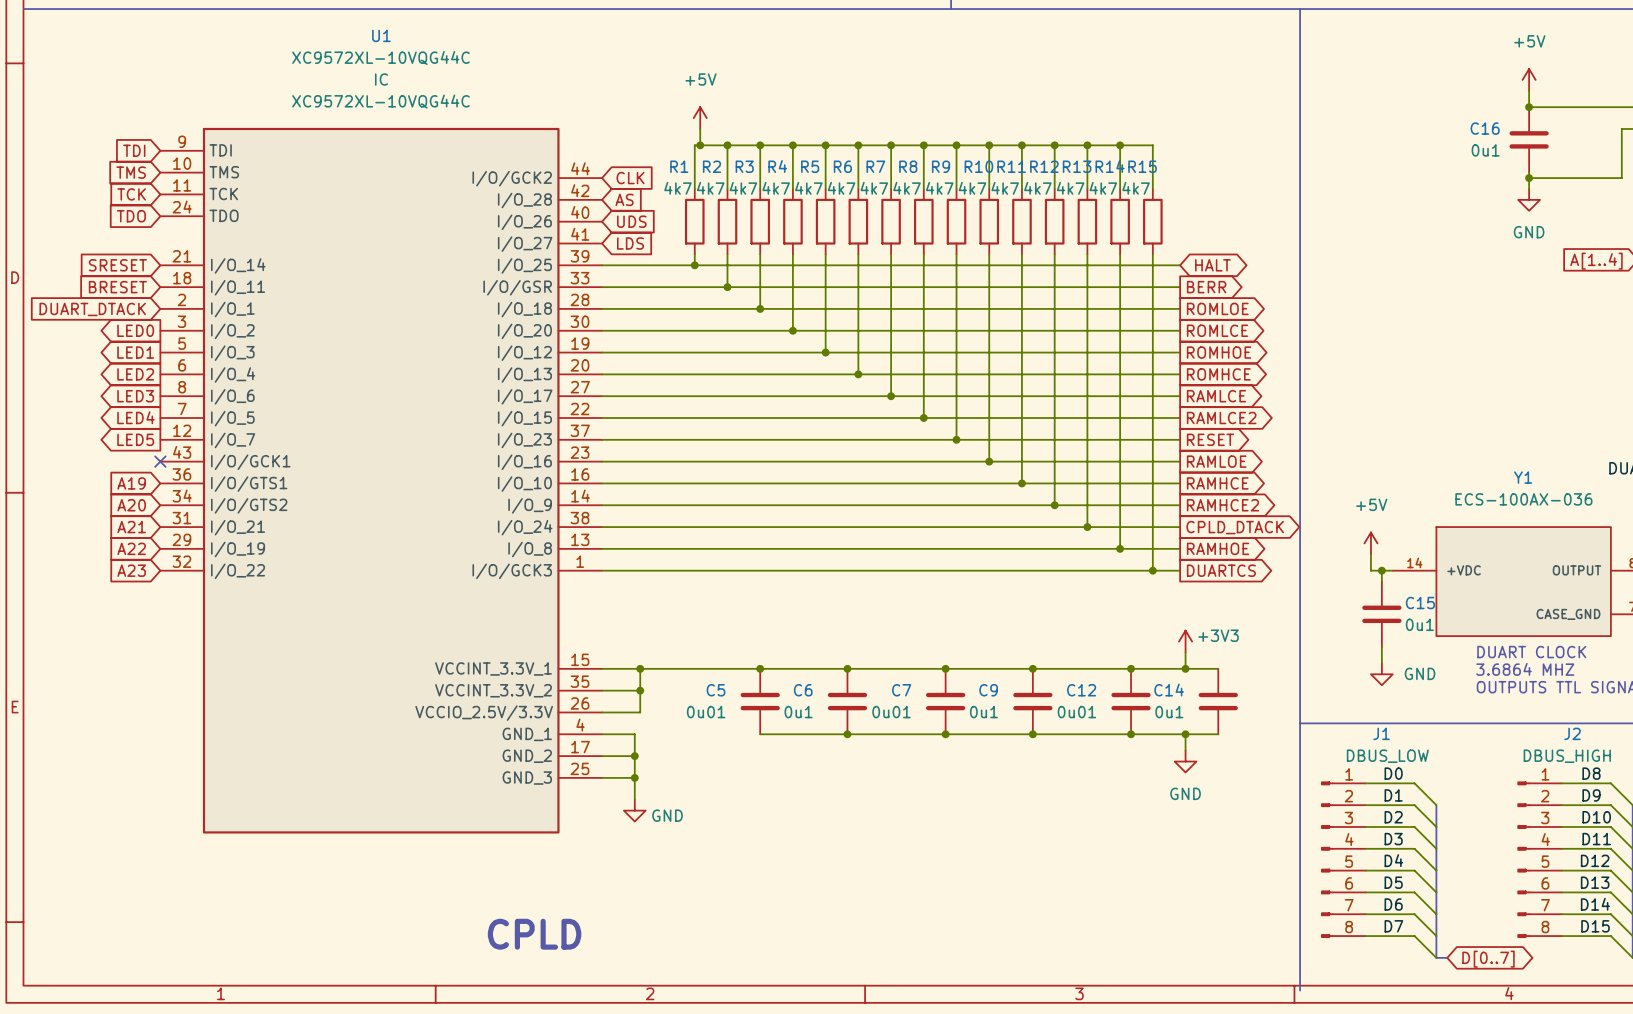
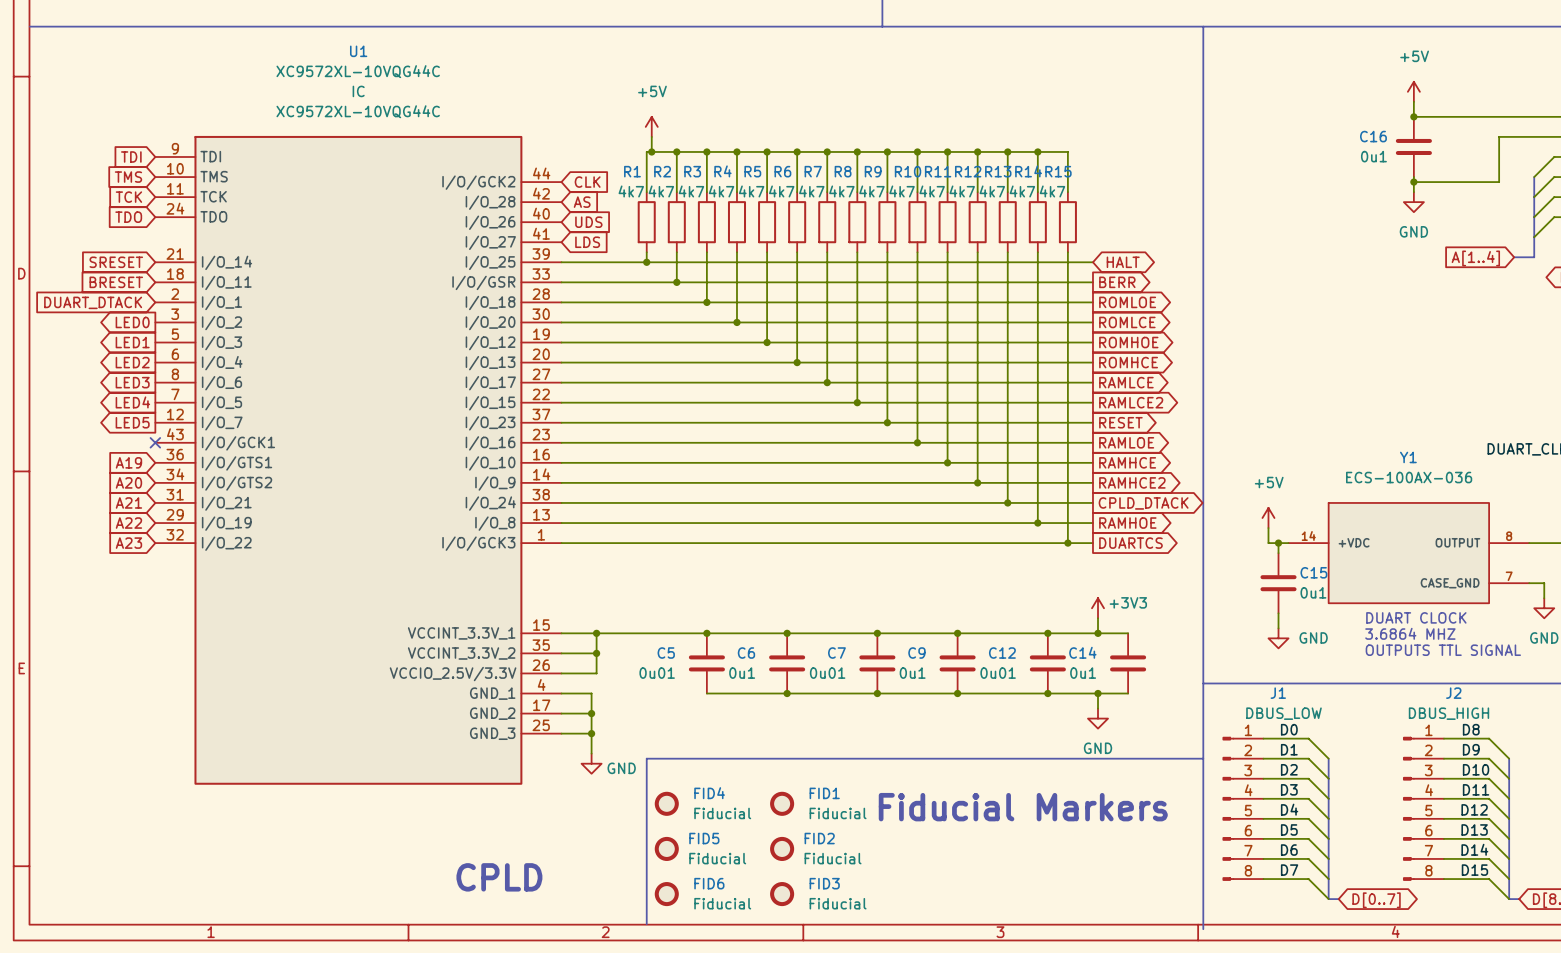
line: none -> (1203, 758) (646, 758) (646, 924)
FID4: none -> Fiducial (666, 803)
FID1: none -> Fiducial (782, 803)
text: none -> Fiducial Markers (1023, 807)
FID5: none -> Fiducial (666, 848)
FID2: none -> Fiducial (782, 848)
FID6: none -> Fiducial (666, 894)
FID3: none -> Fiducial (782, 894)

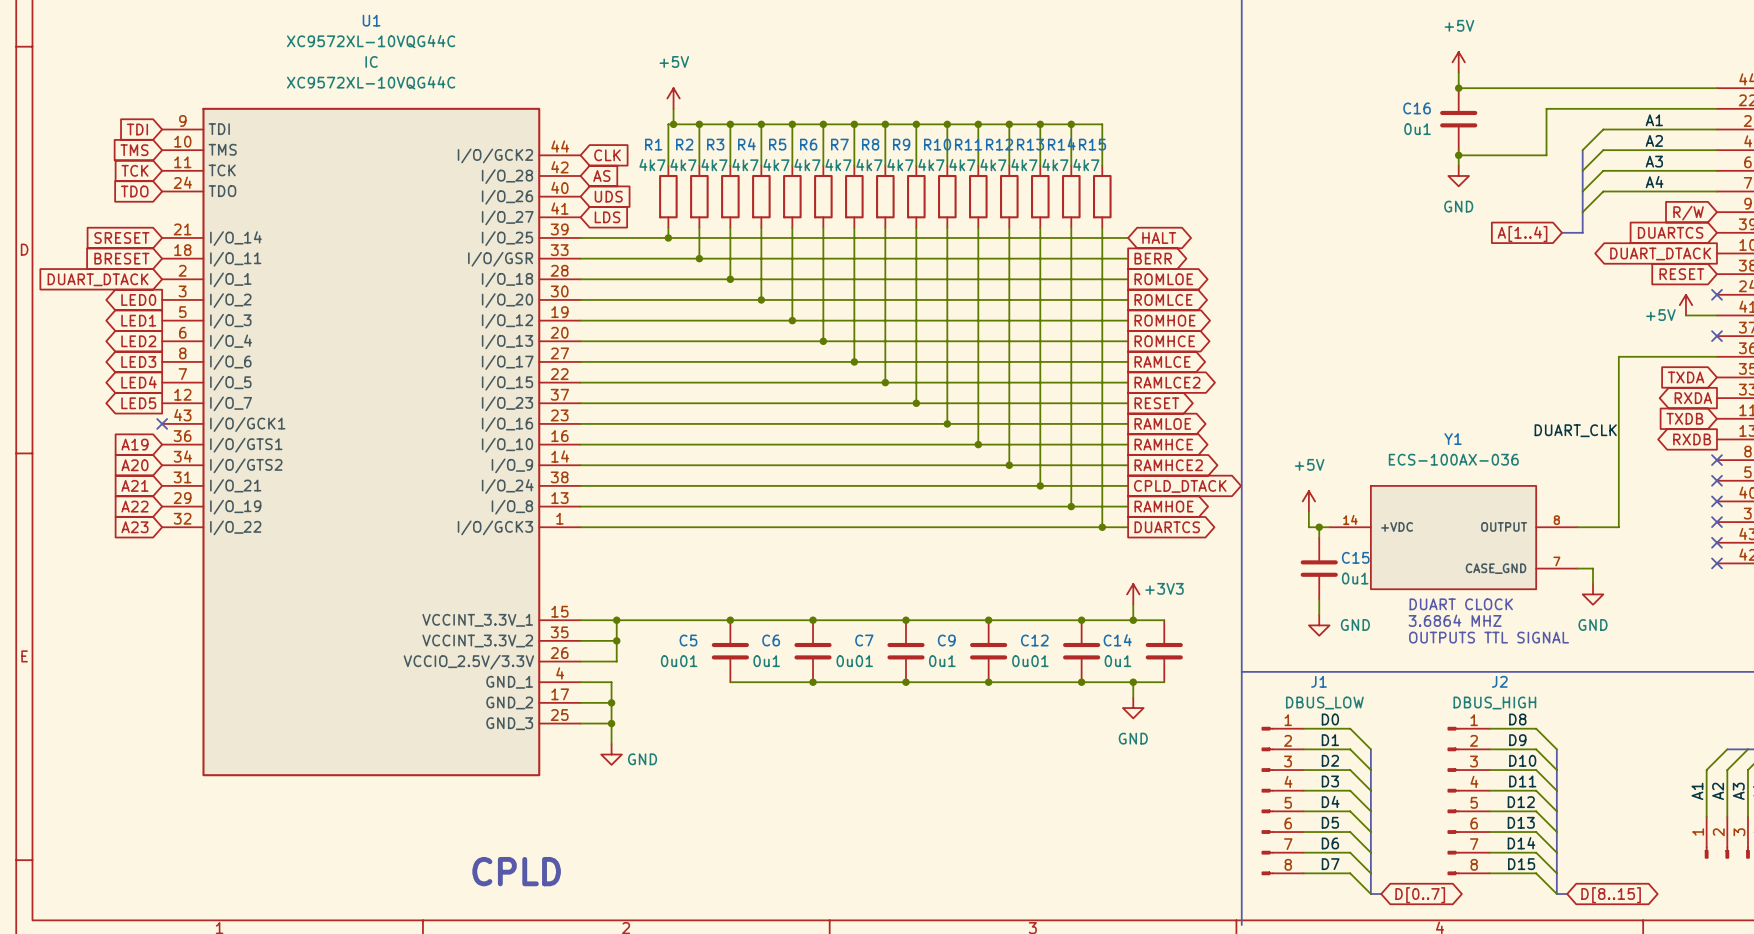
line: (1203, 758) (646, 758) (646, 924) -> none
FID4: Fiducial (666, 803) -> none
FID1: Fiducial (782, 803) -> none
text: Fiducial Markers (1023, 807) -> none
FID5: Fiducial (666, 848) -> none
FID2: Fiducial (782, 848) -> none
FID6: Fiducial (666, 894) -> none
FID3: Fiducial (782, 894) -> none

